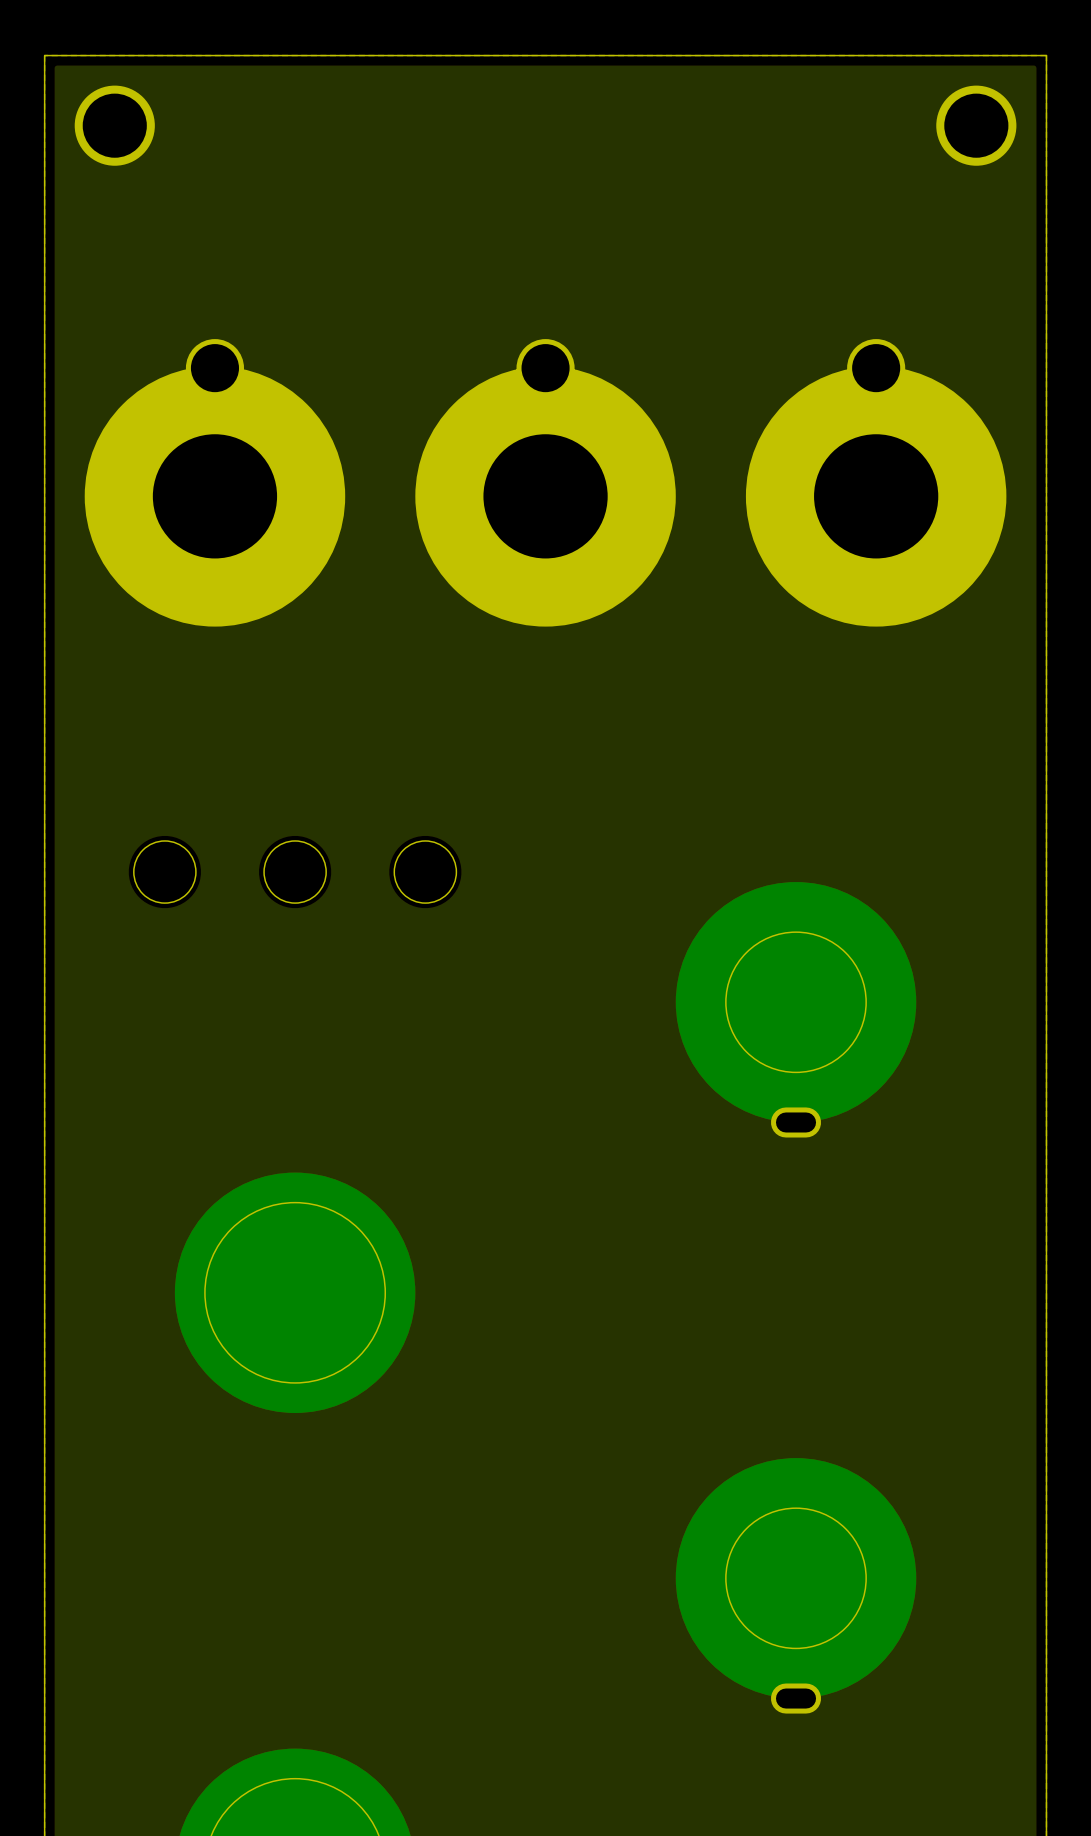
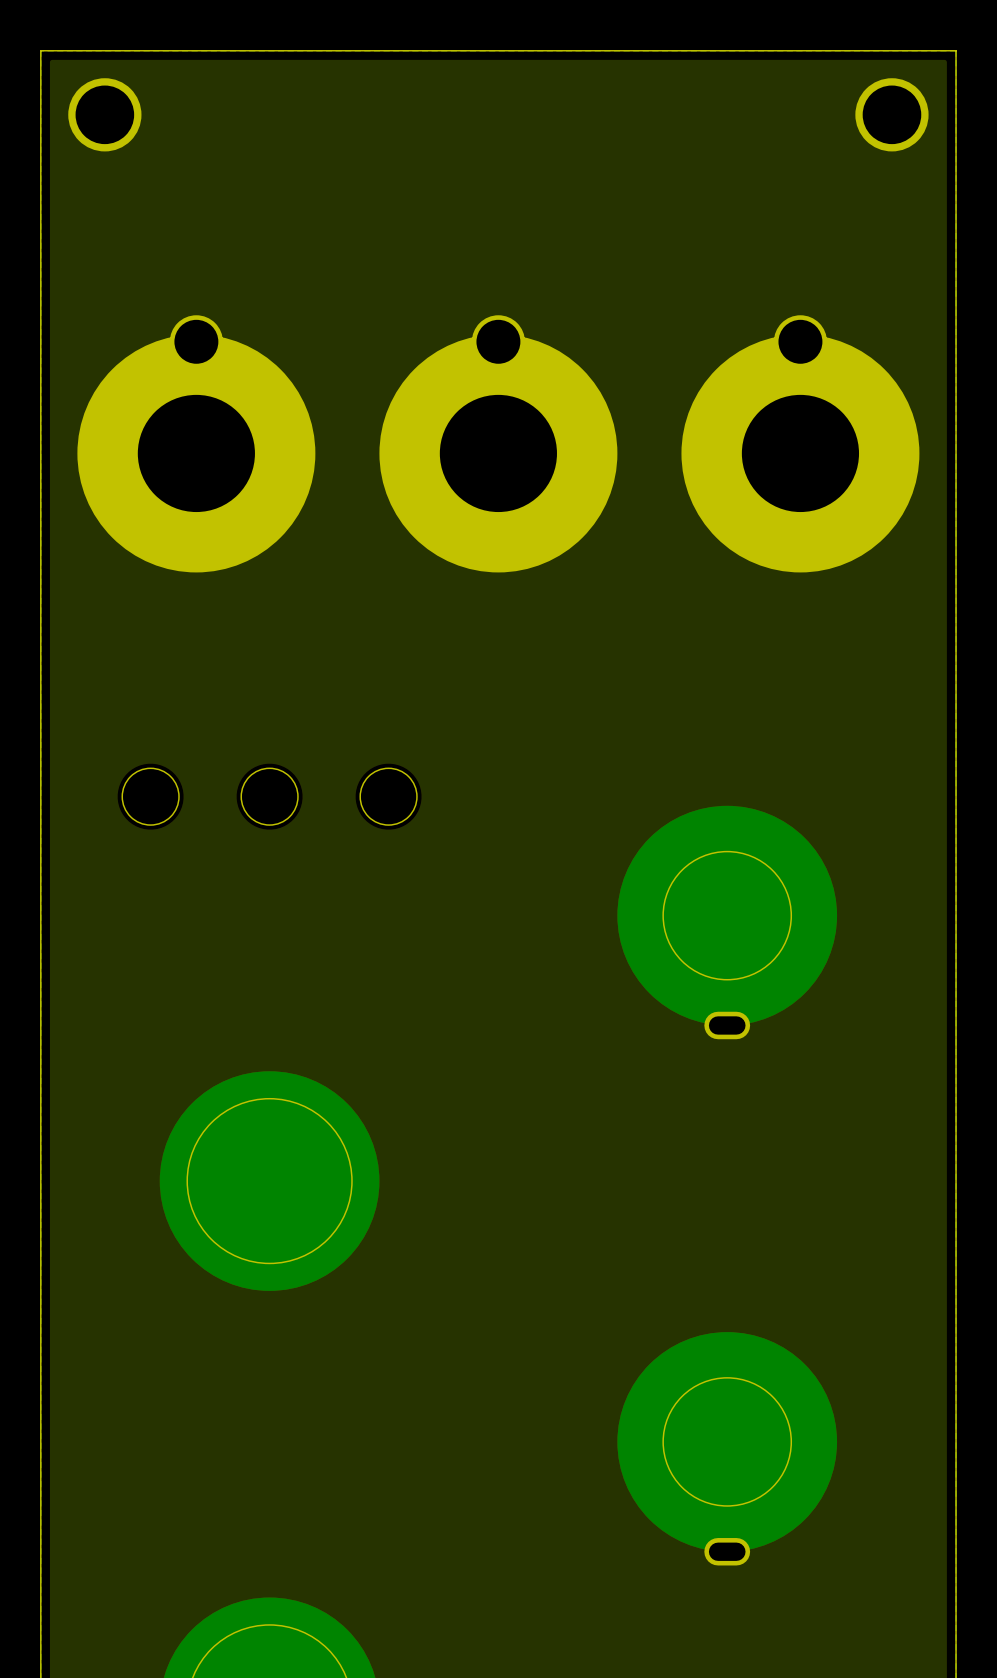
part footprint: [84, 339, 346, 627] -> [77, 315, 316, 573]
part footprint: [415, 339, 676, 627] -> [379, 315, 618, 573]
part footprint: [745, 339, 1007, 627] -> [681, 315, 920, 573]

